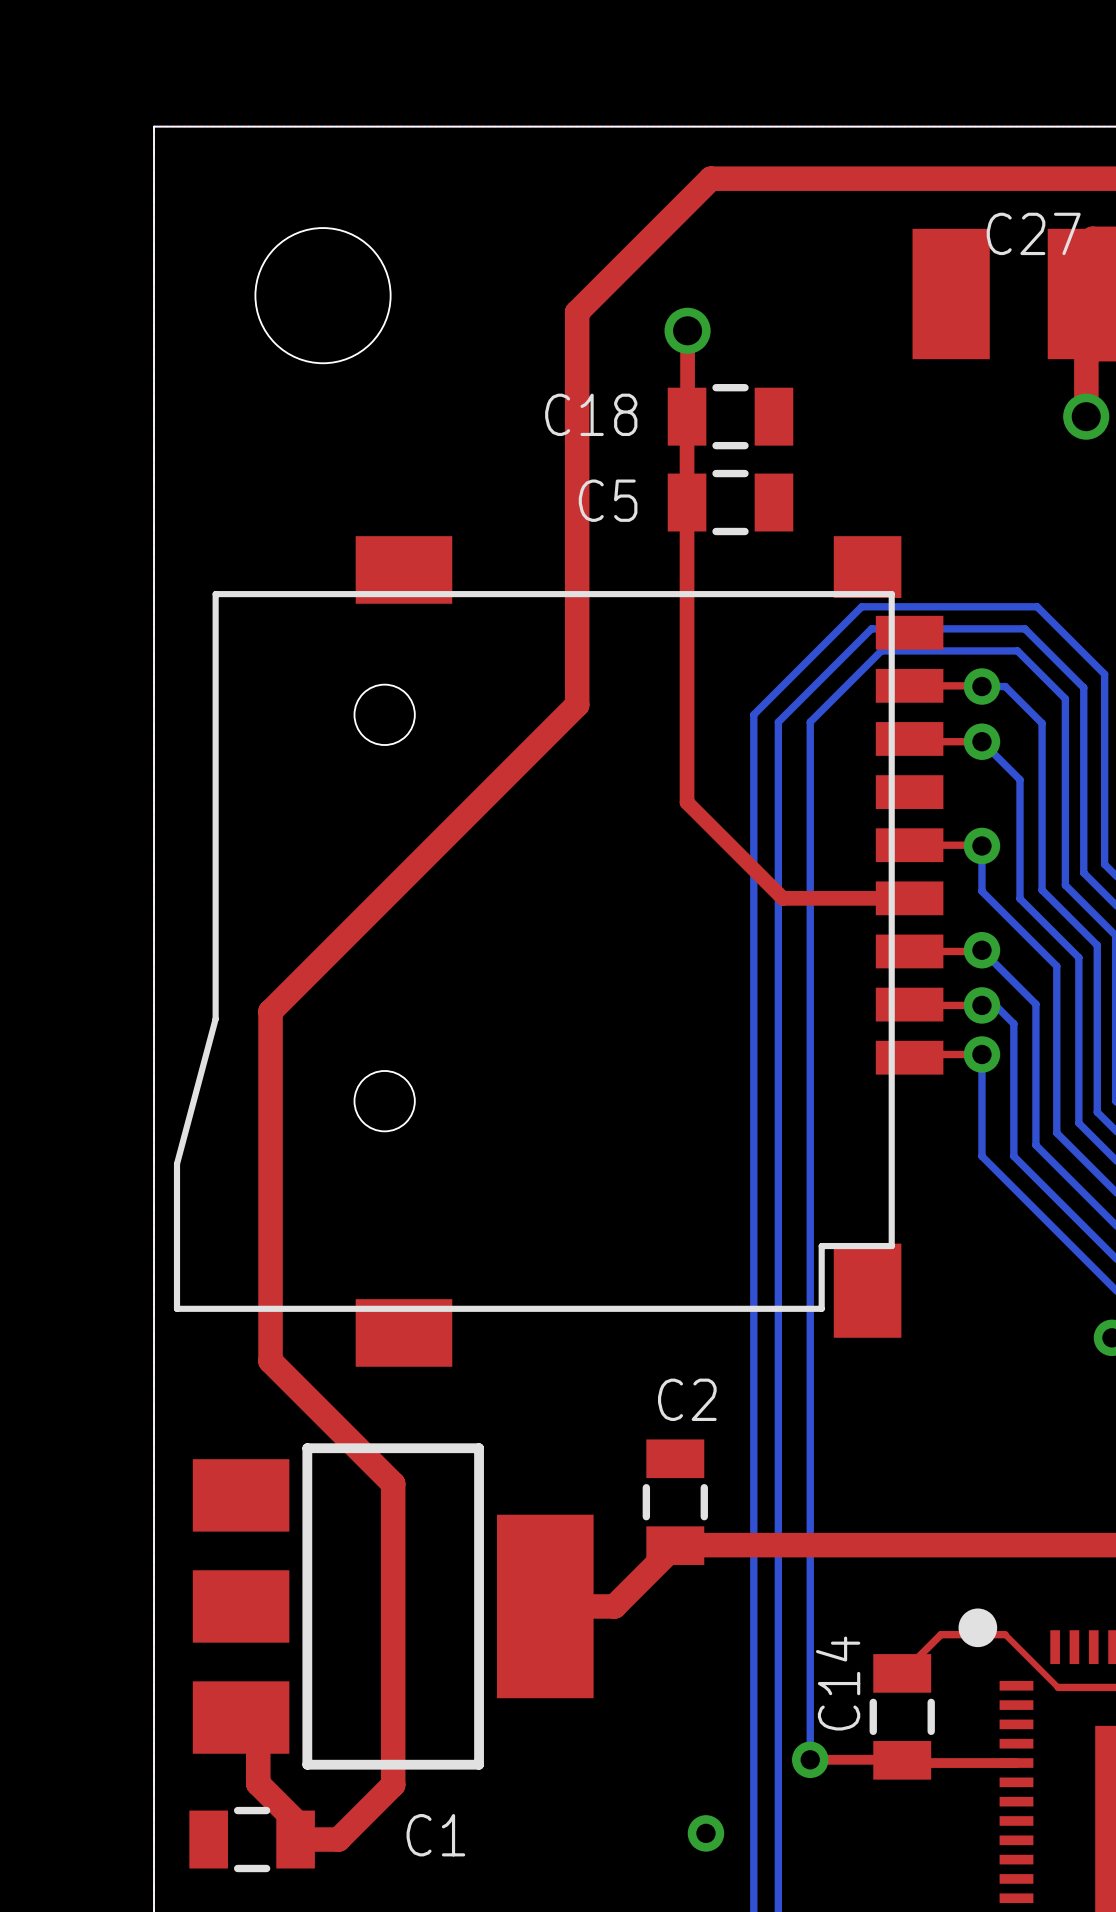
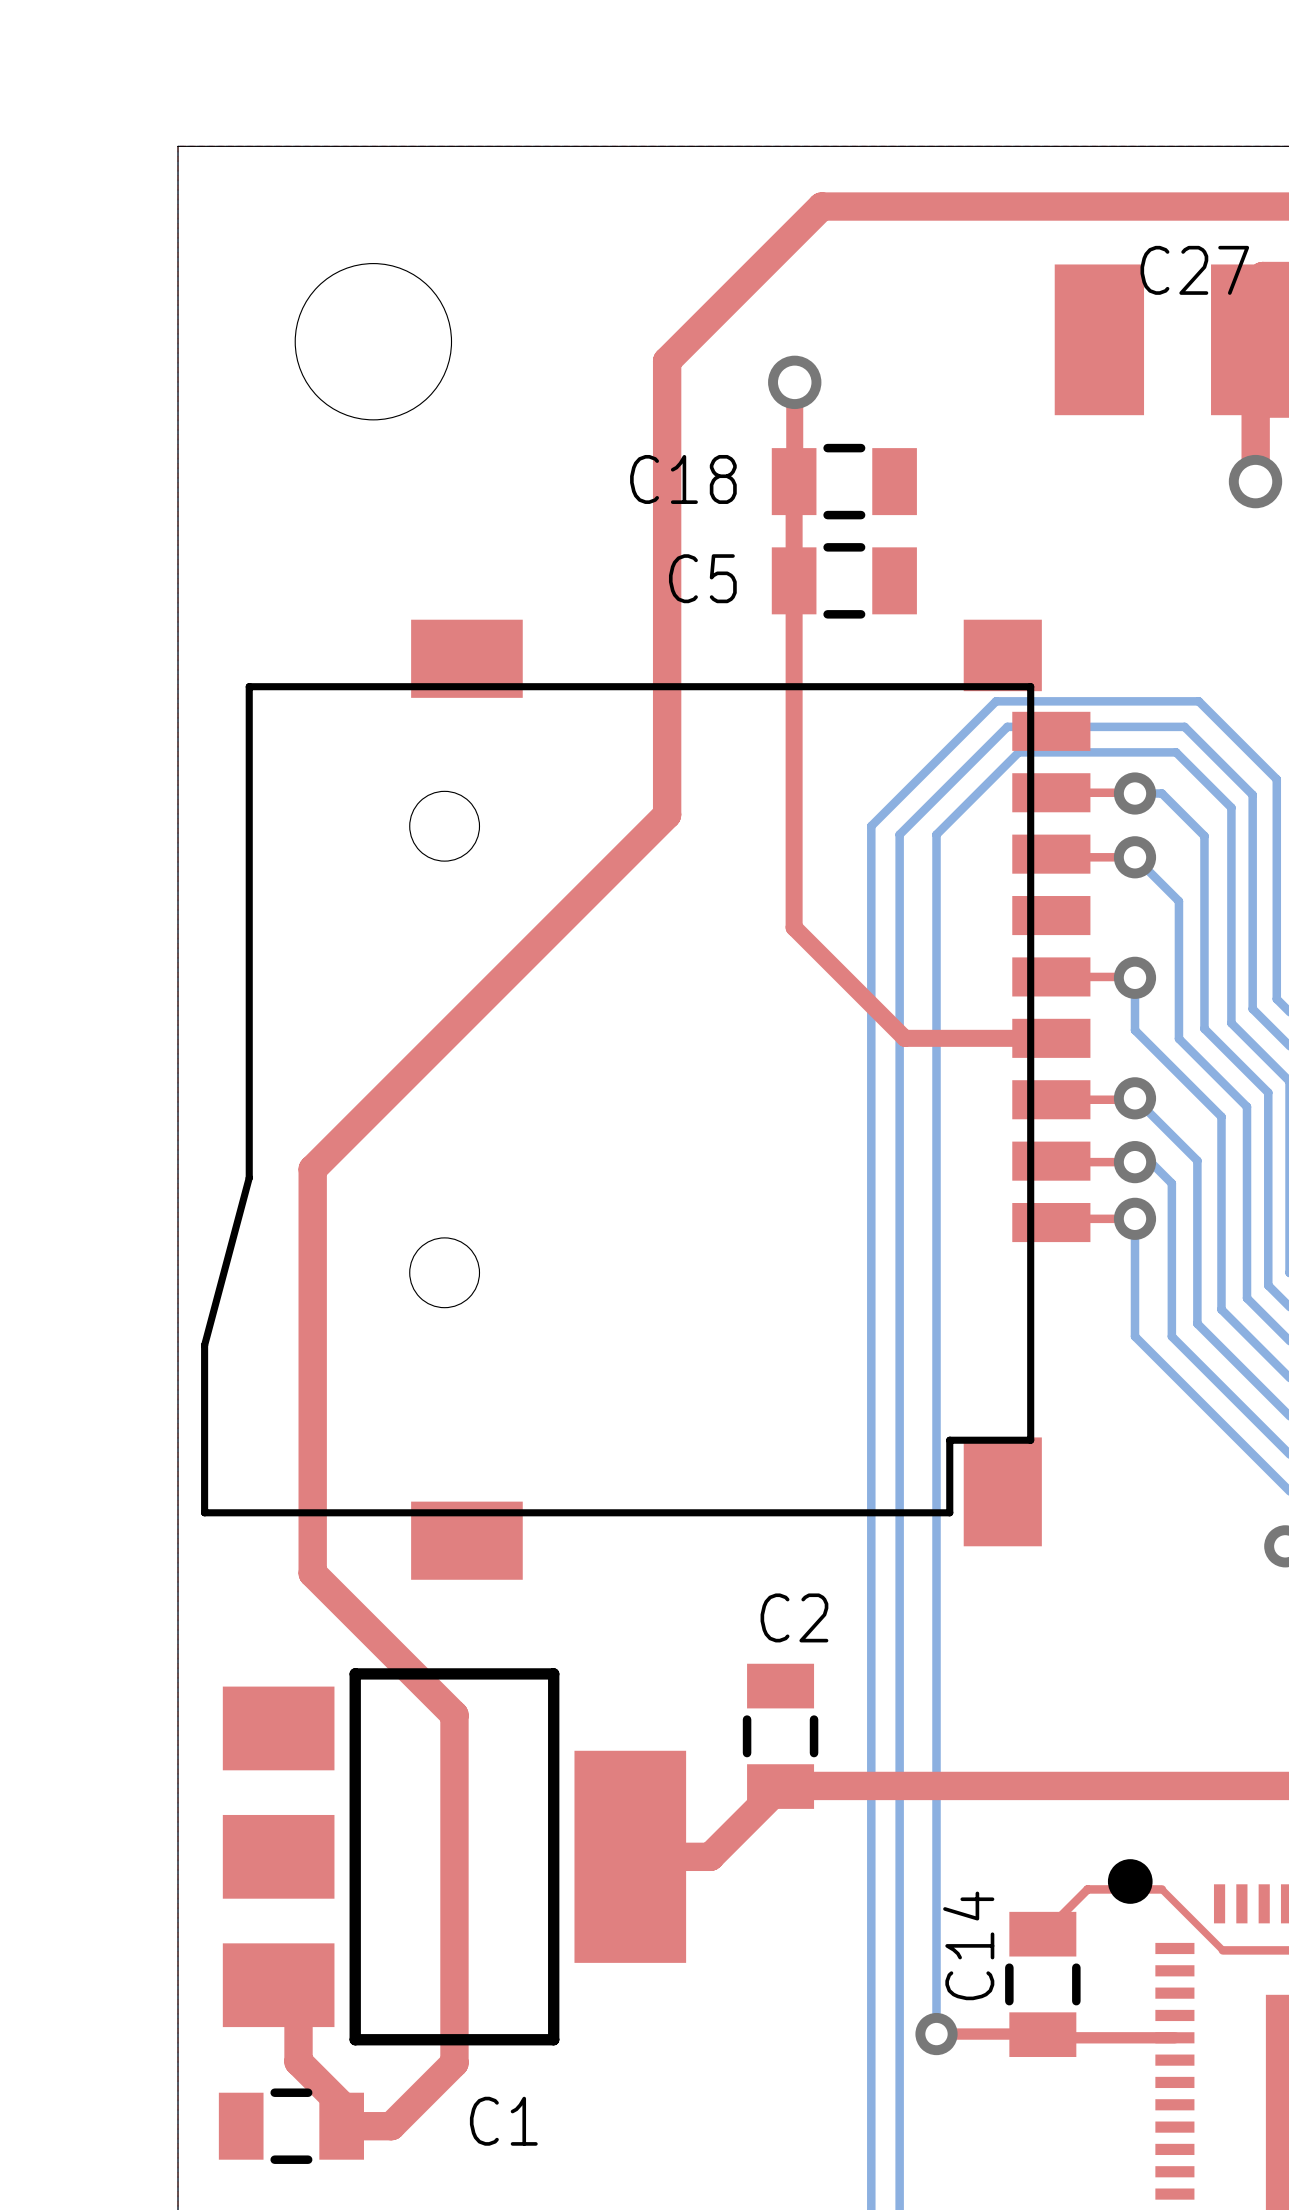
via: (705, 1833) -> none

